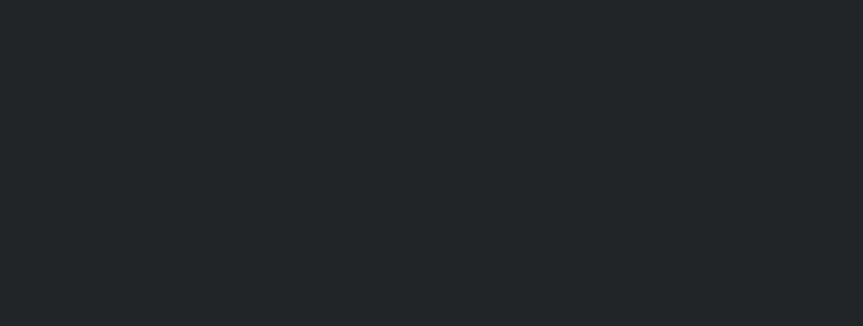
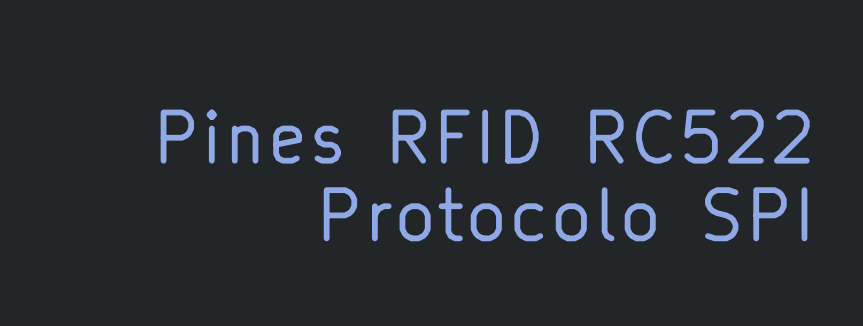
text: none -> Pines RFID RC522 (485, 136)
text: none -> Protocolo SPI (565, 214)

